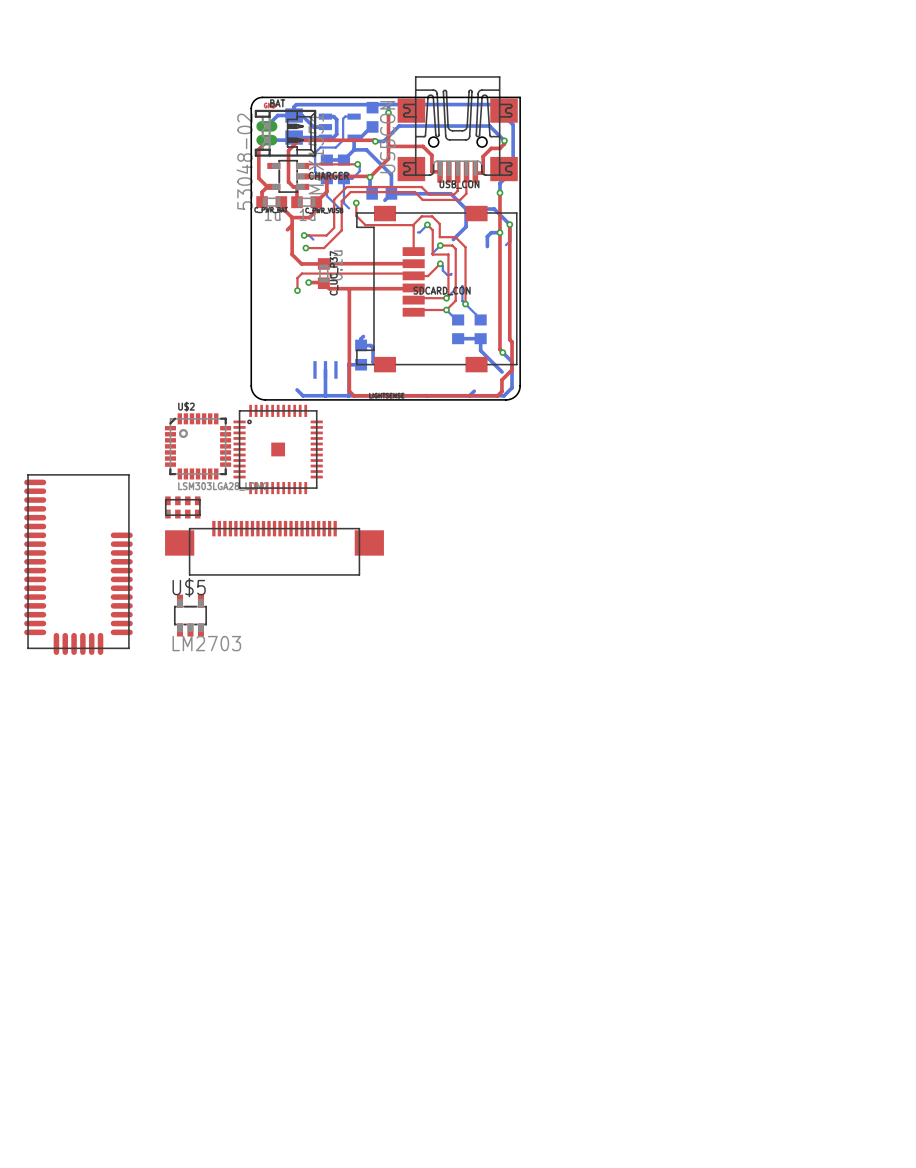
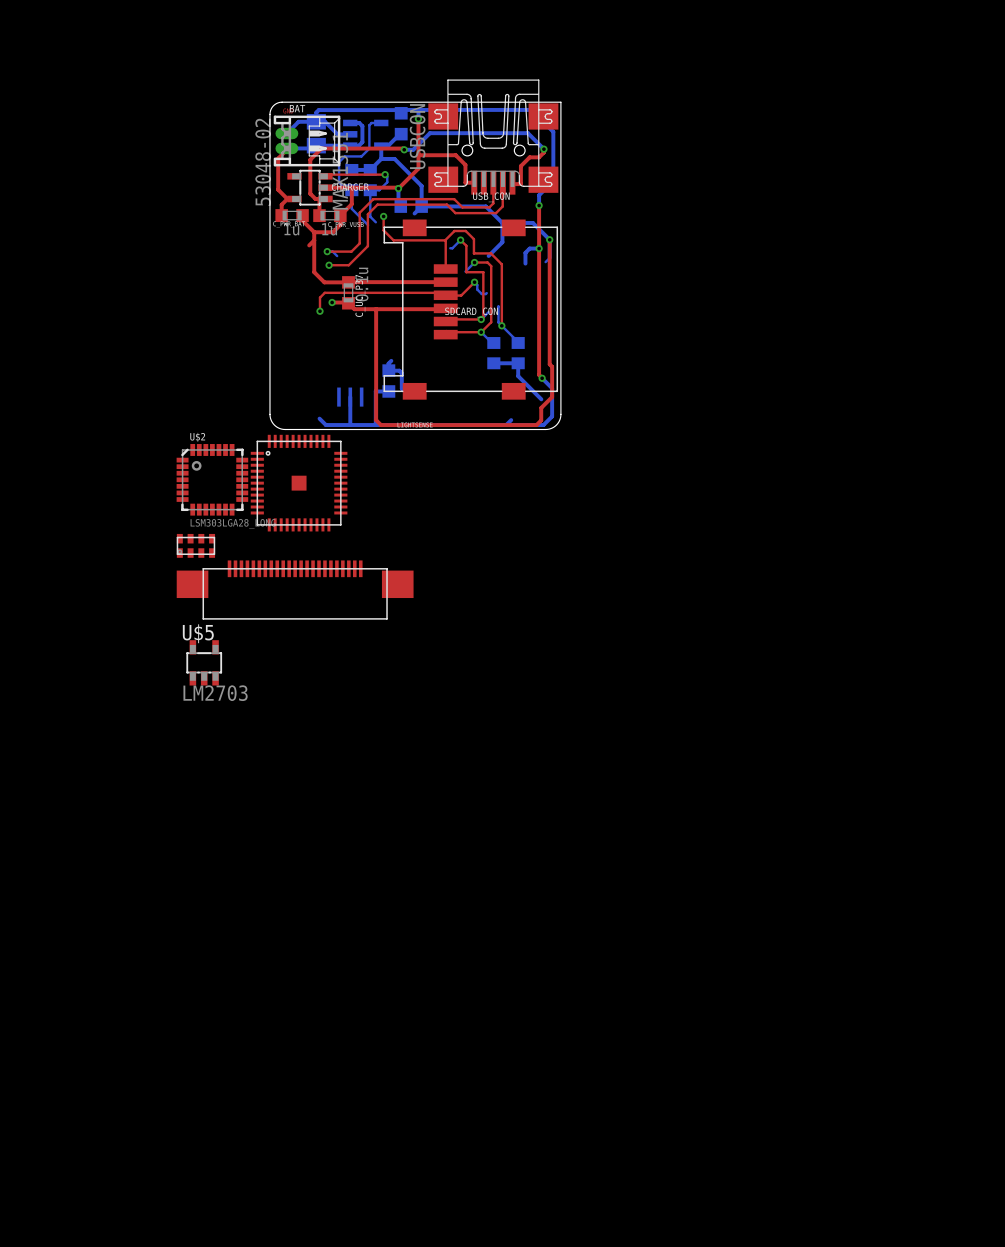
part: (78, 564) -> none

